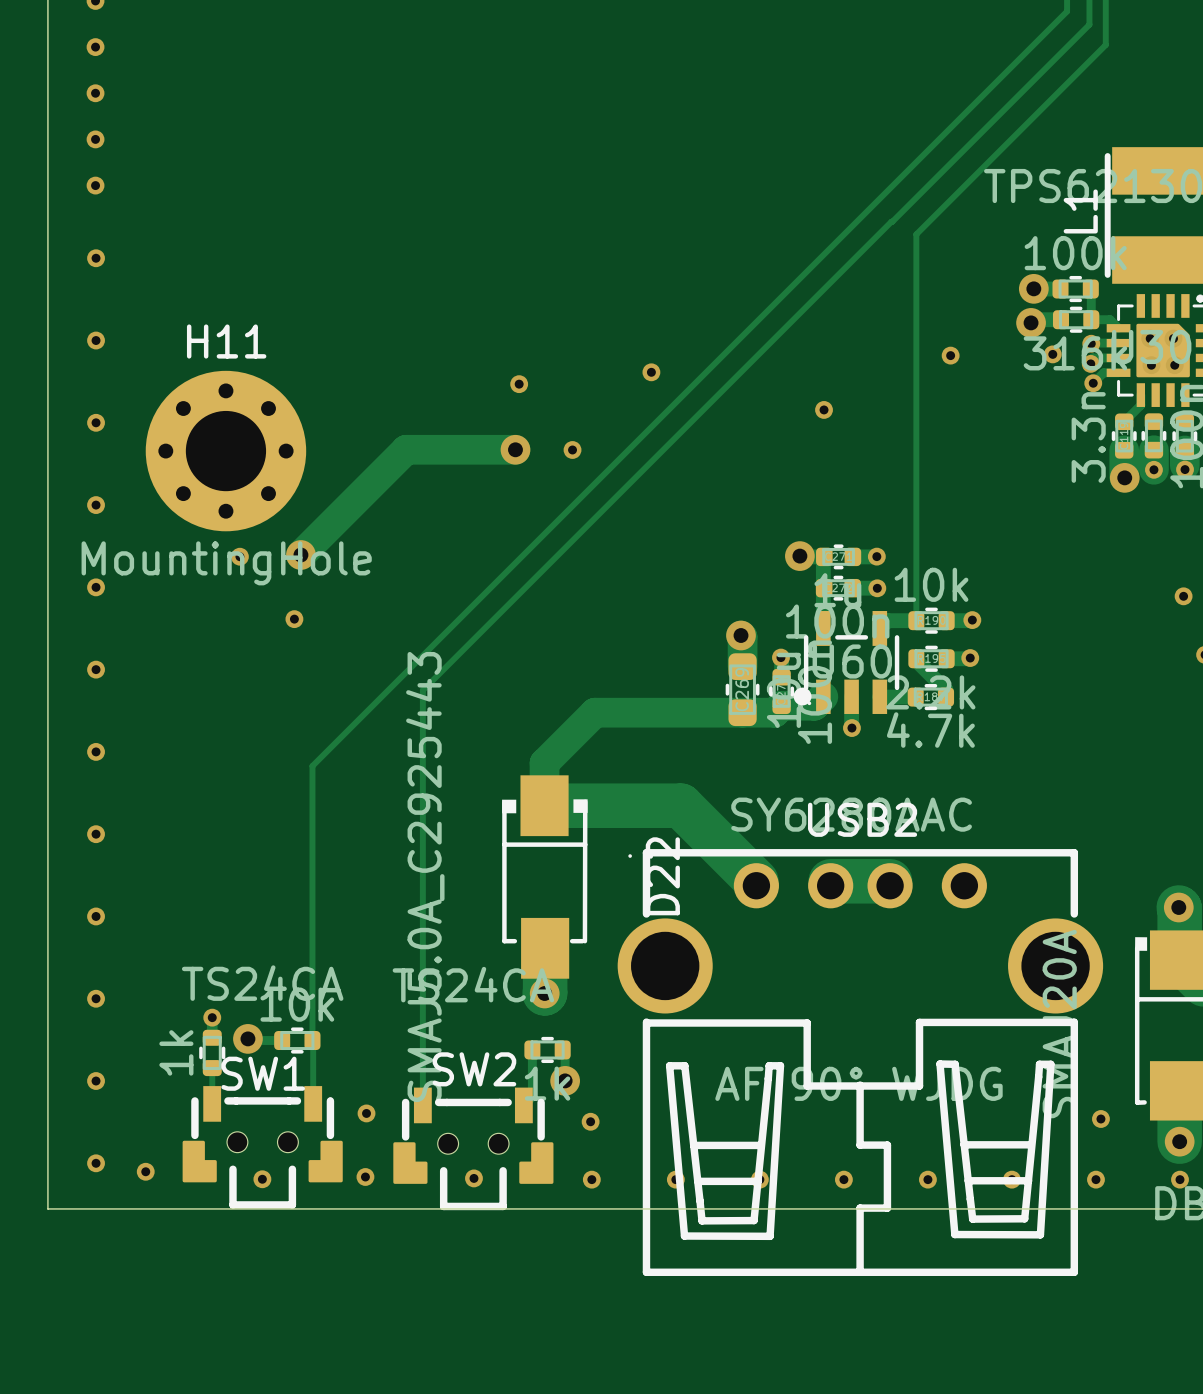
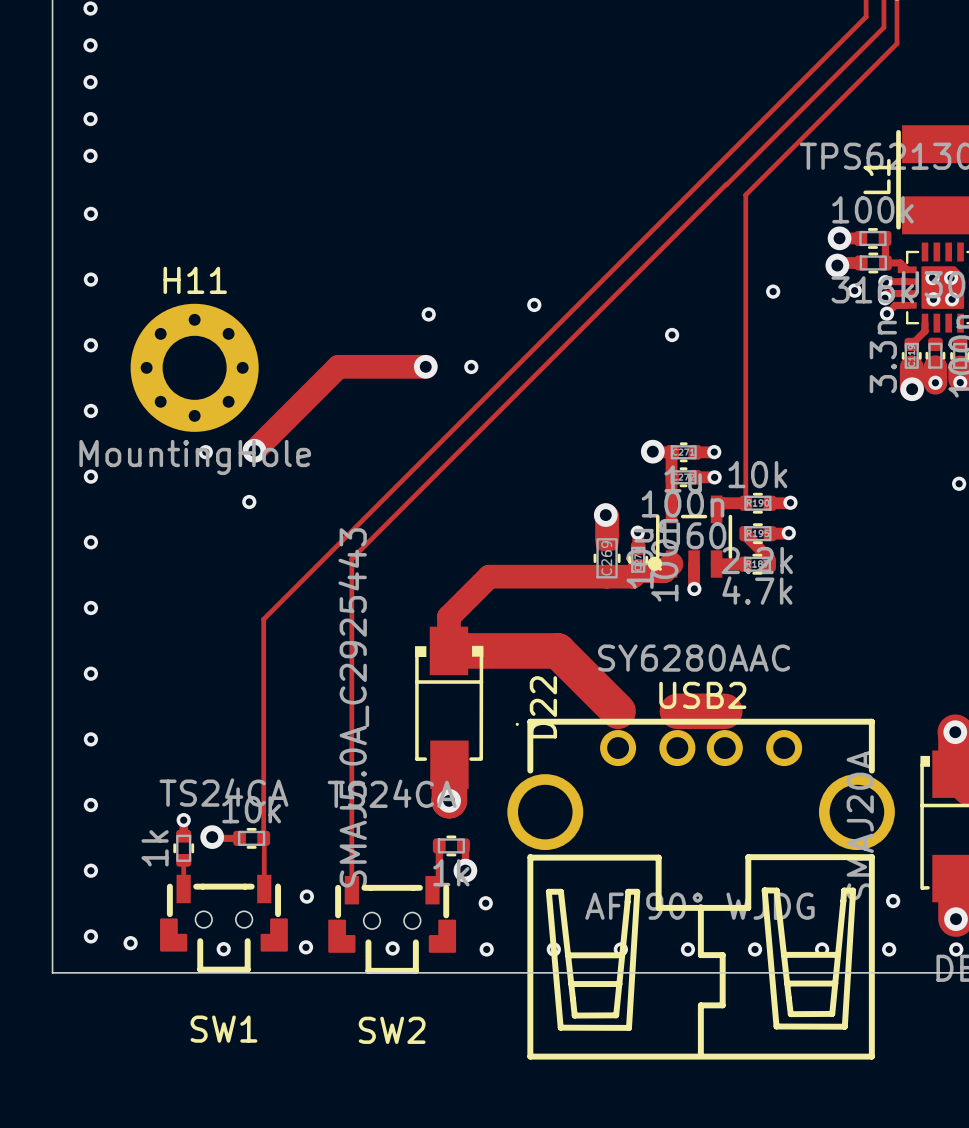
USB2 position: (860, 1062) -> (701, 889)
SW2 name position: SW2 (474, 1069) -> SW2 (392, 1030)
SW1 name position: SW1 (263, 1073) -> SW1 (223, 1029)

